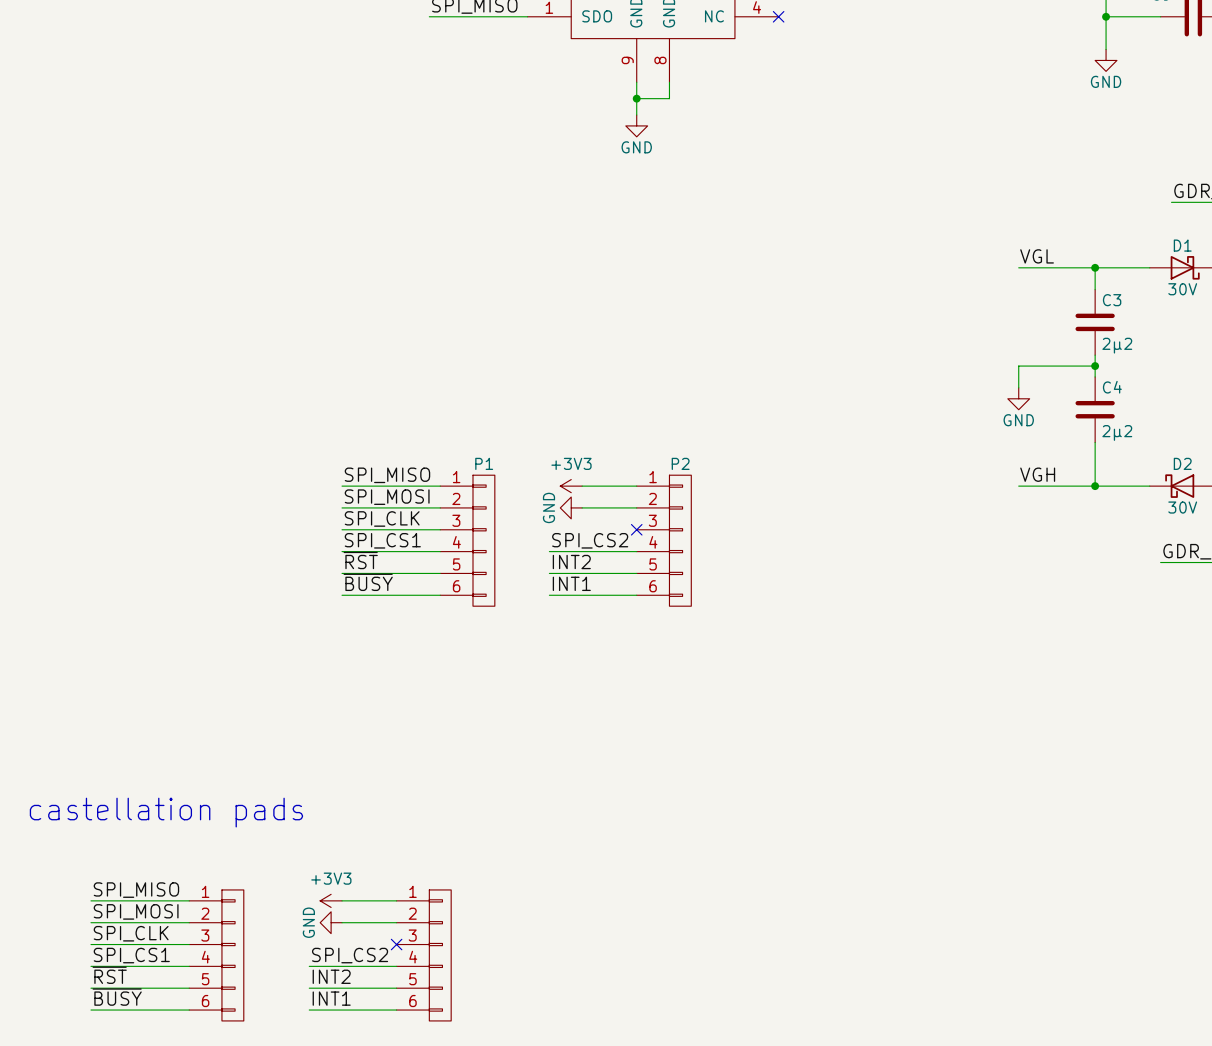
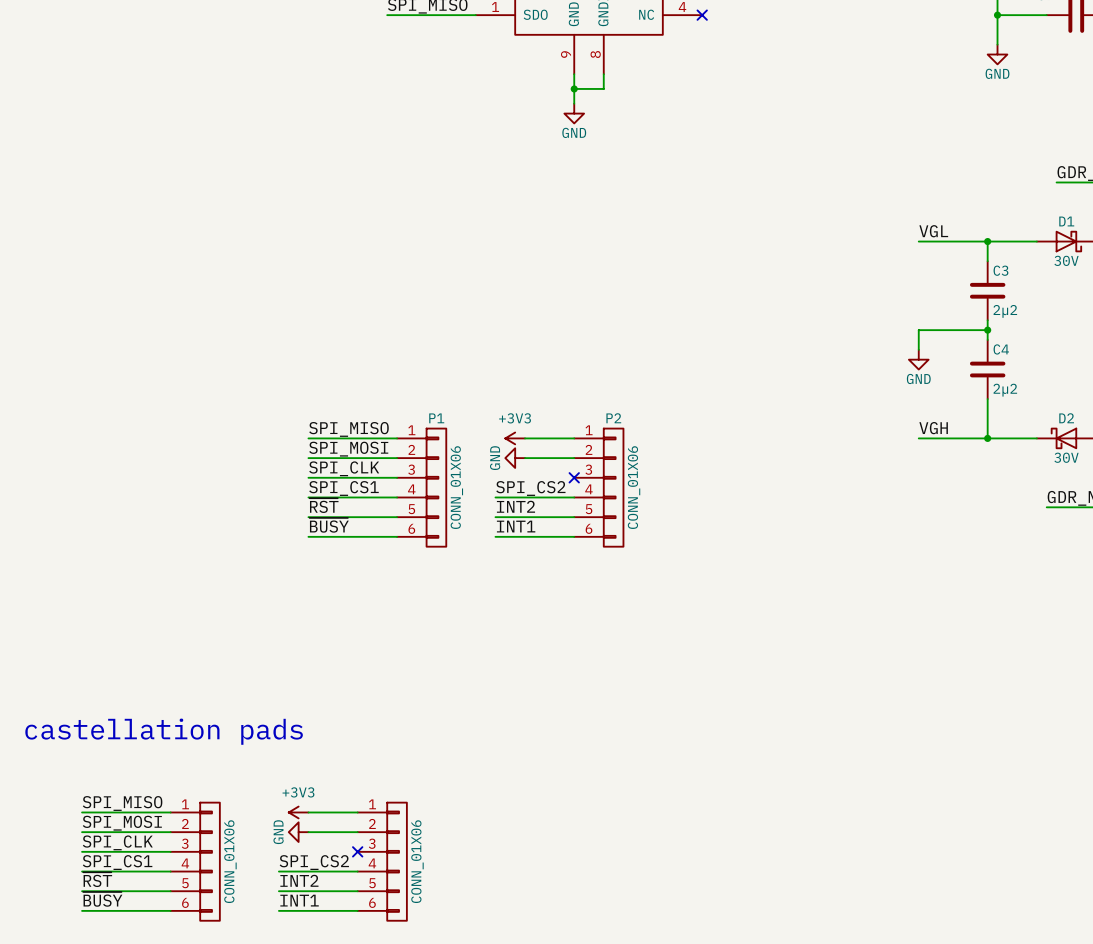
P1 value: none -> CONN_01X06 (456, 487)
P2 value: none -> CONN_01X06 (634, 487)
part value: none -> CONN_01X06 (230, 861)
part value: none -> CONN_01X06 (417, 861)

